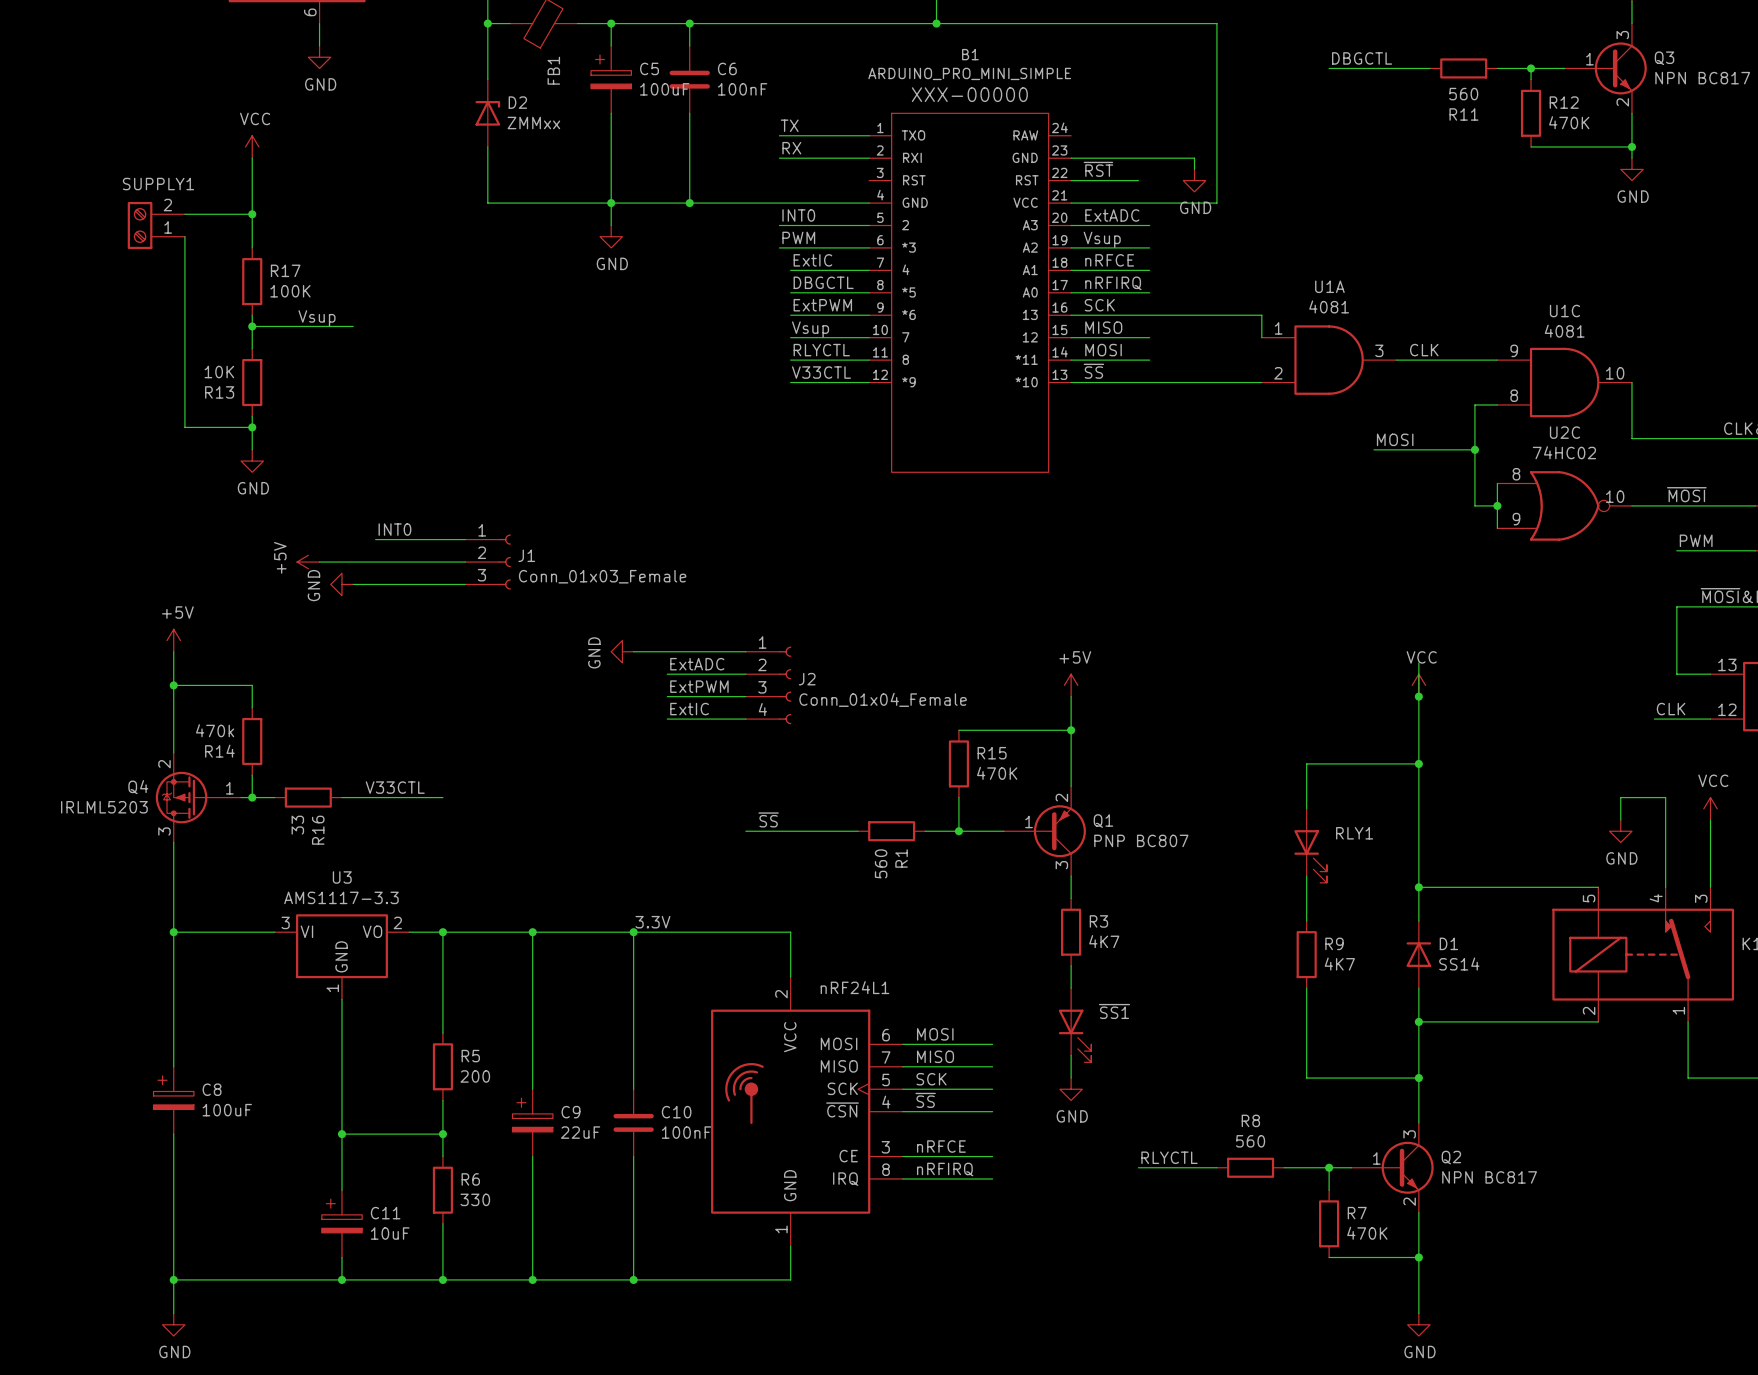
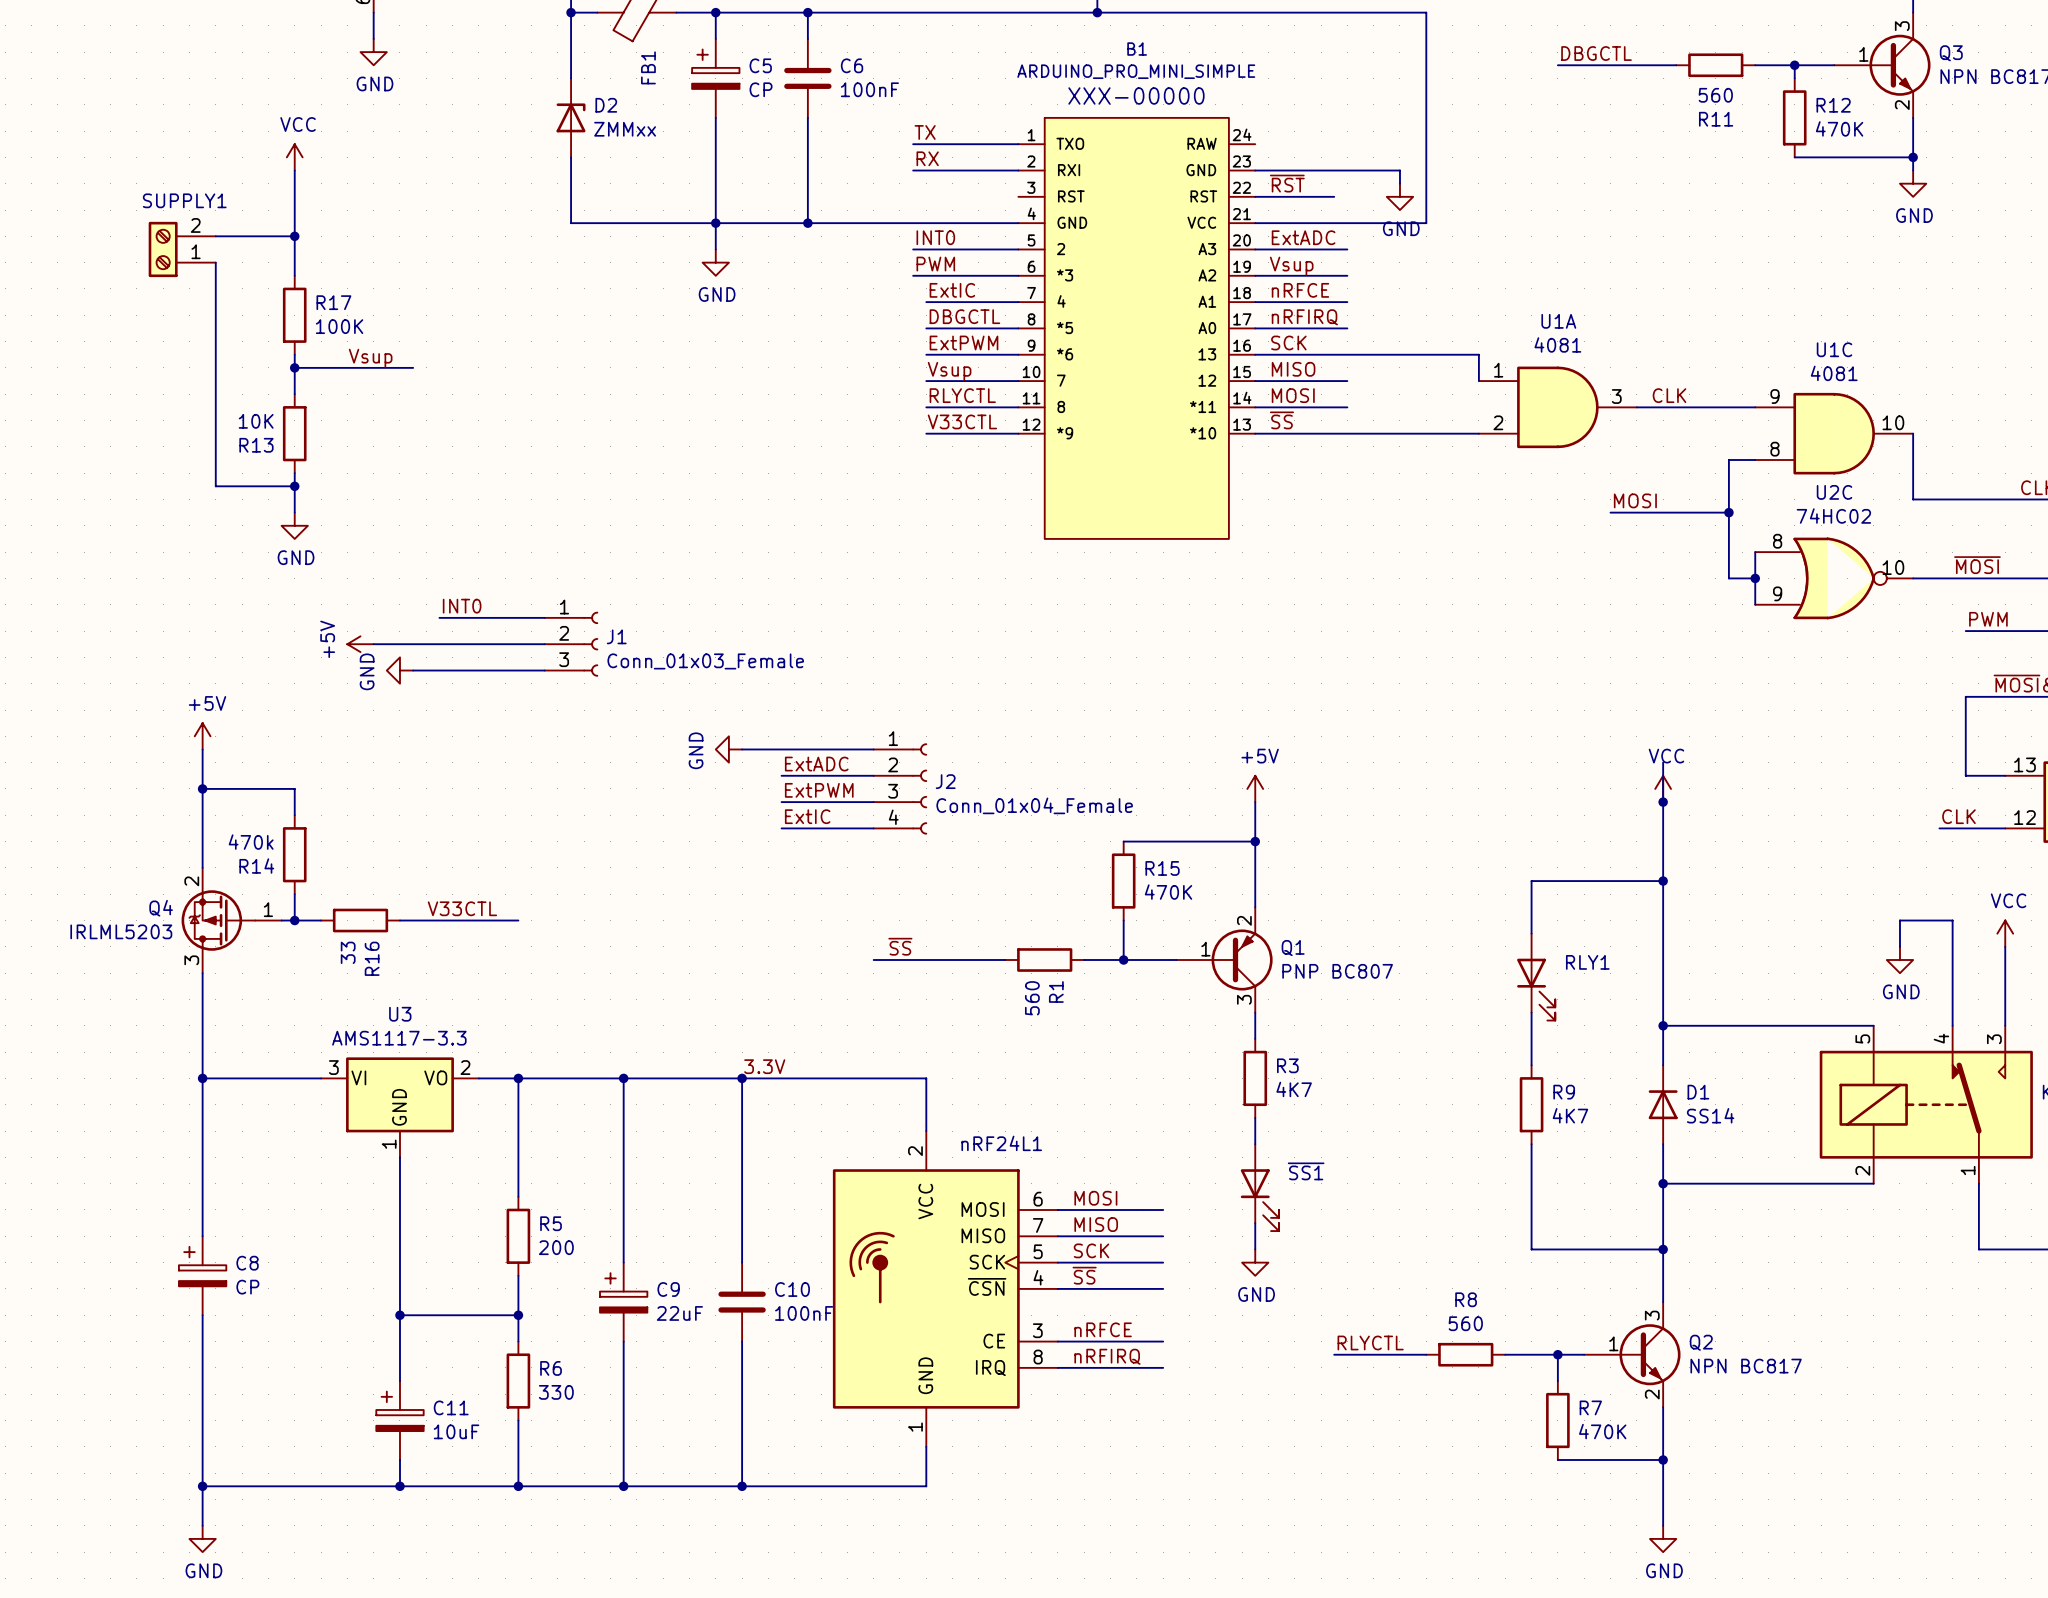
C5 value: 100uF (664, 89) -> CP (761, 89)
C8 value: 100uF (227, 1110) -> CP (247, 1287)

